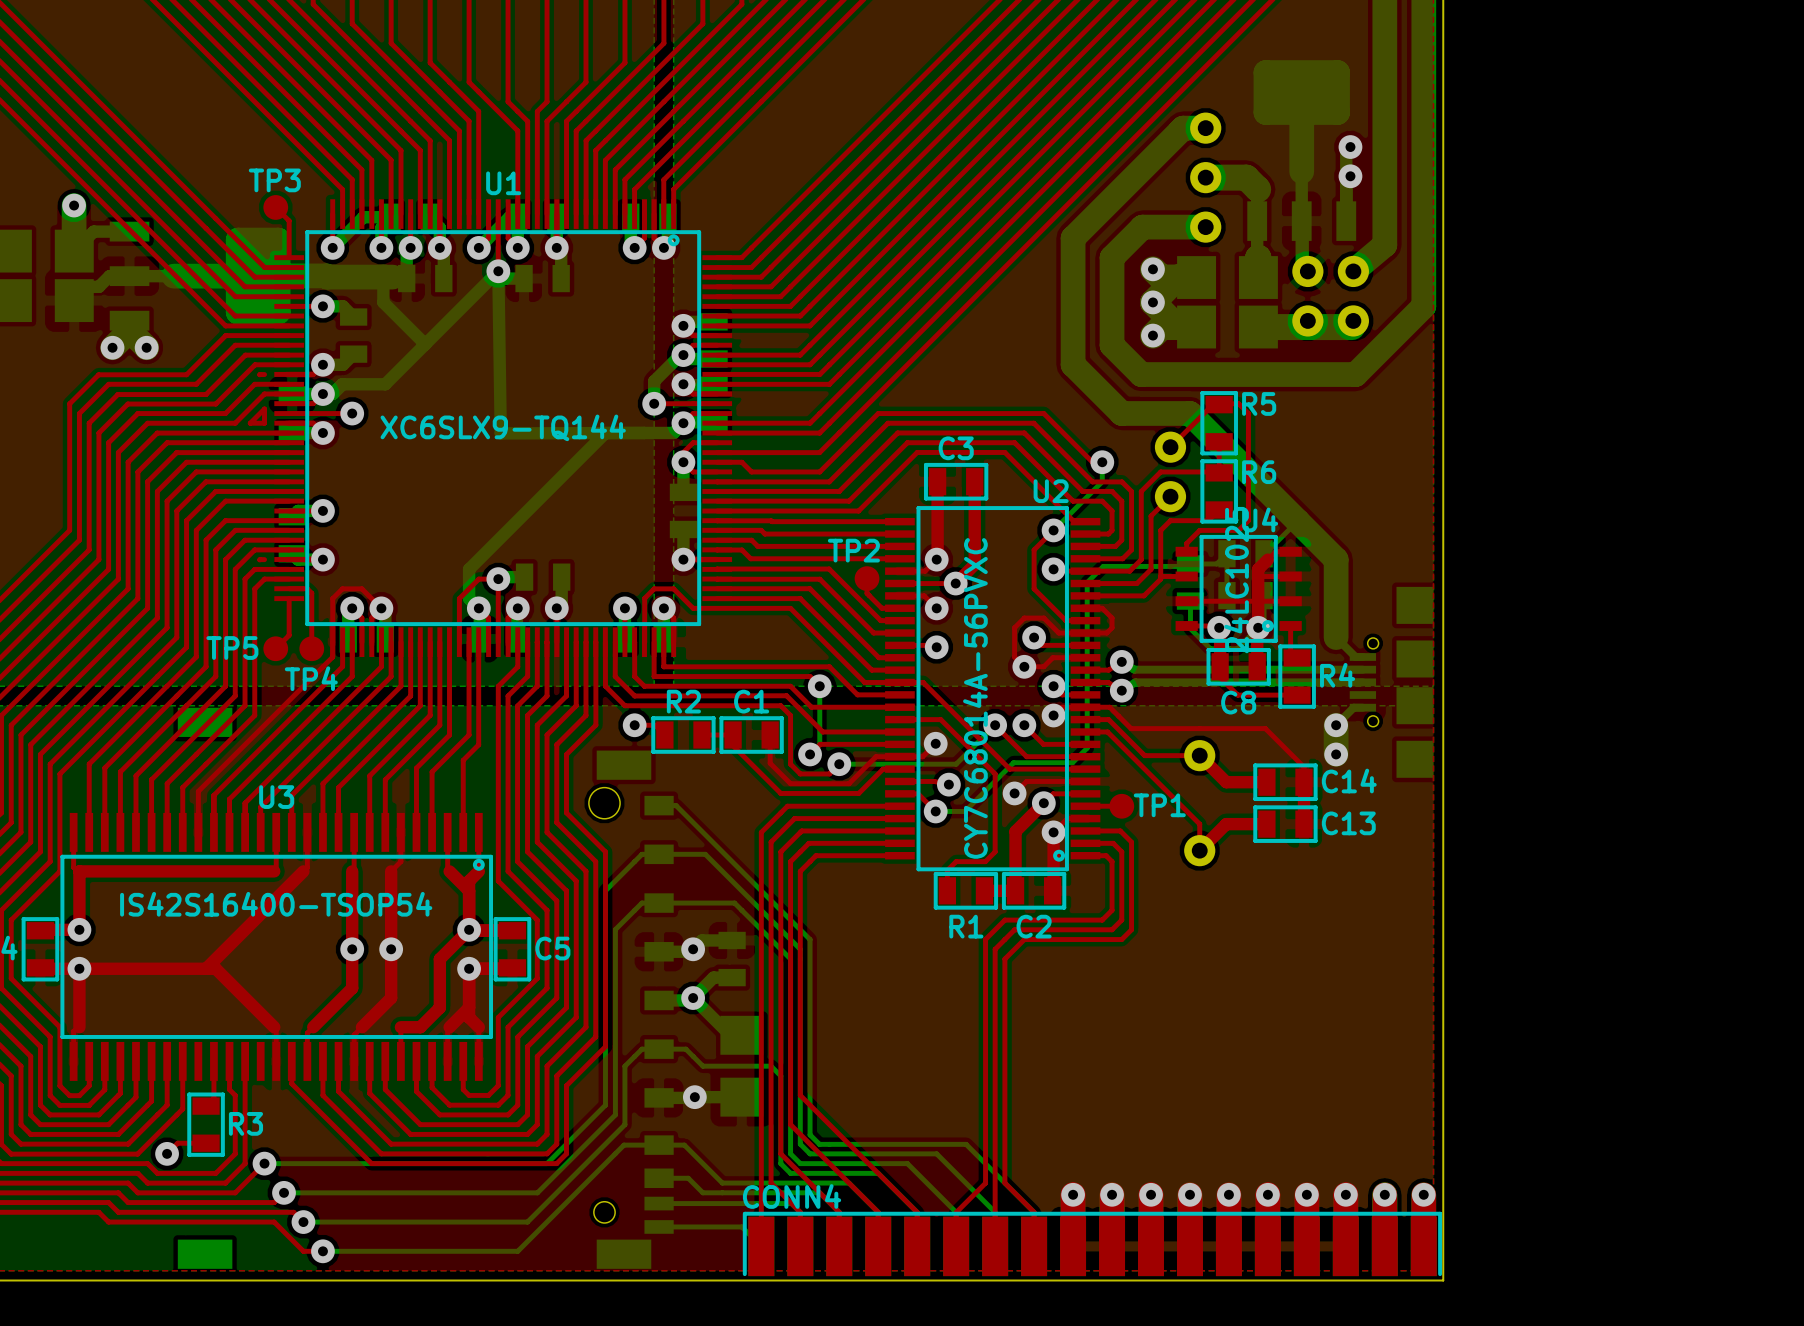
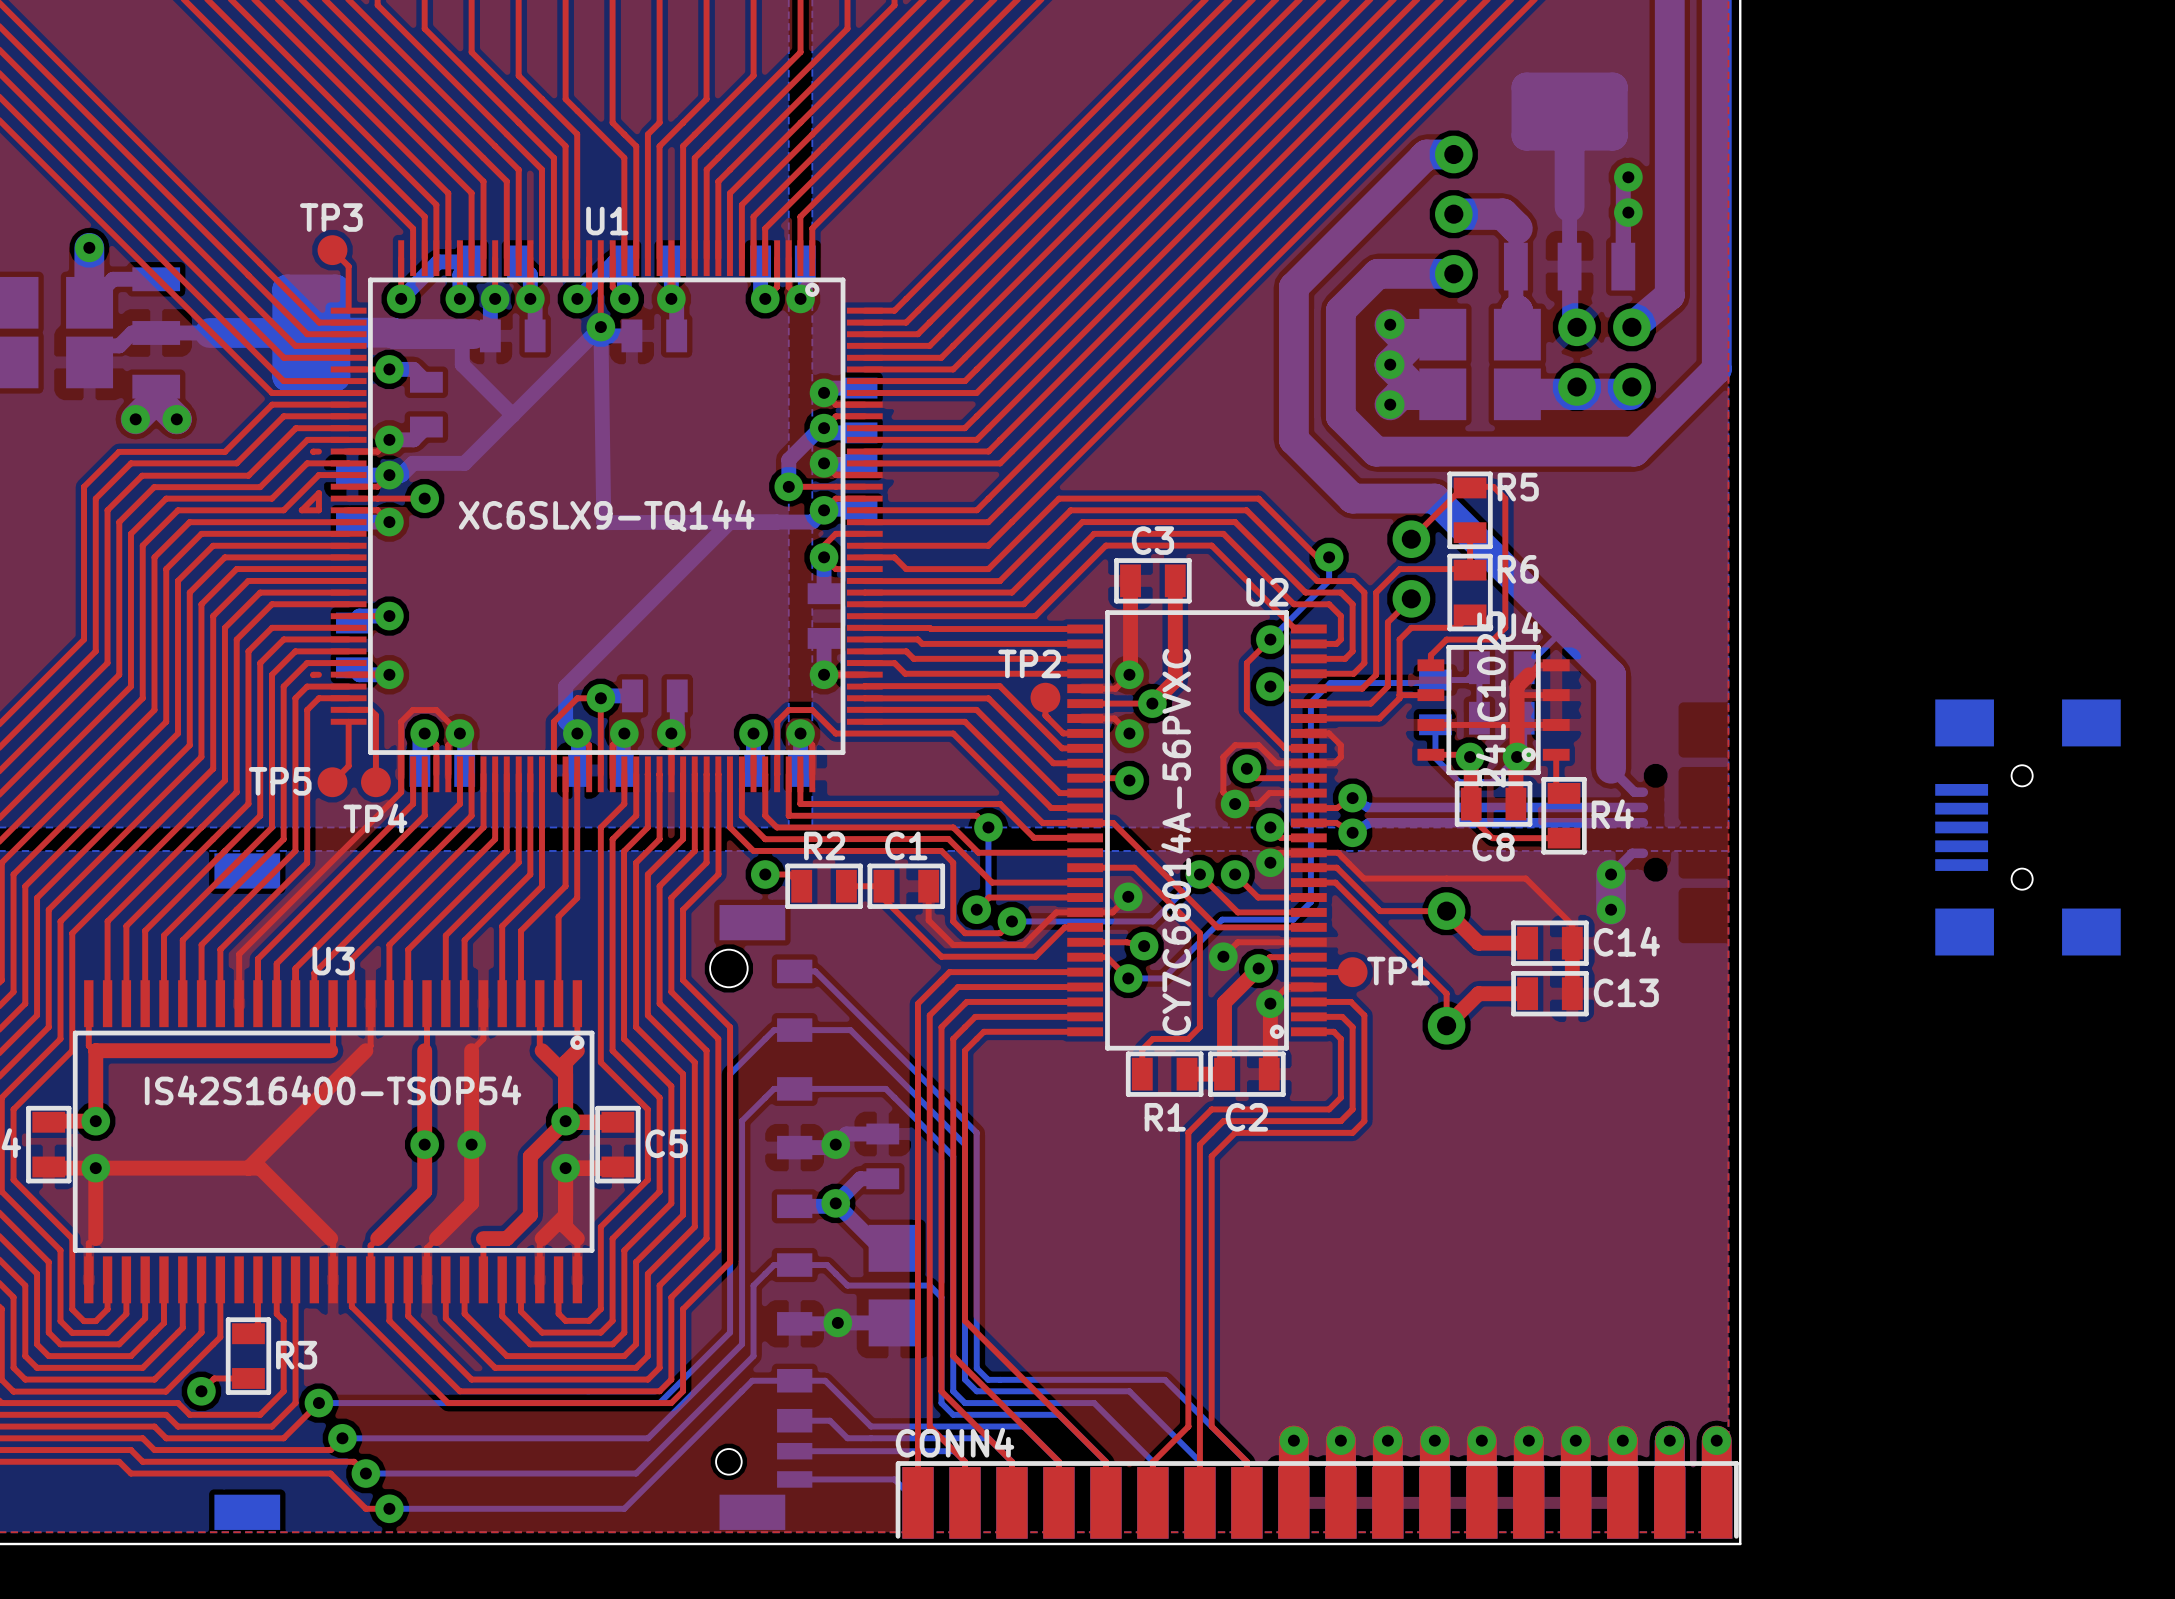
part: (1391, 682) -> none
part: none -> (2027, 827)

